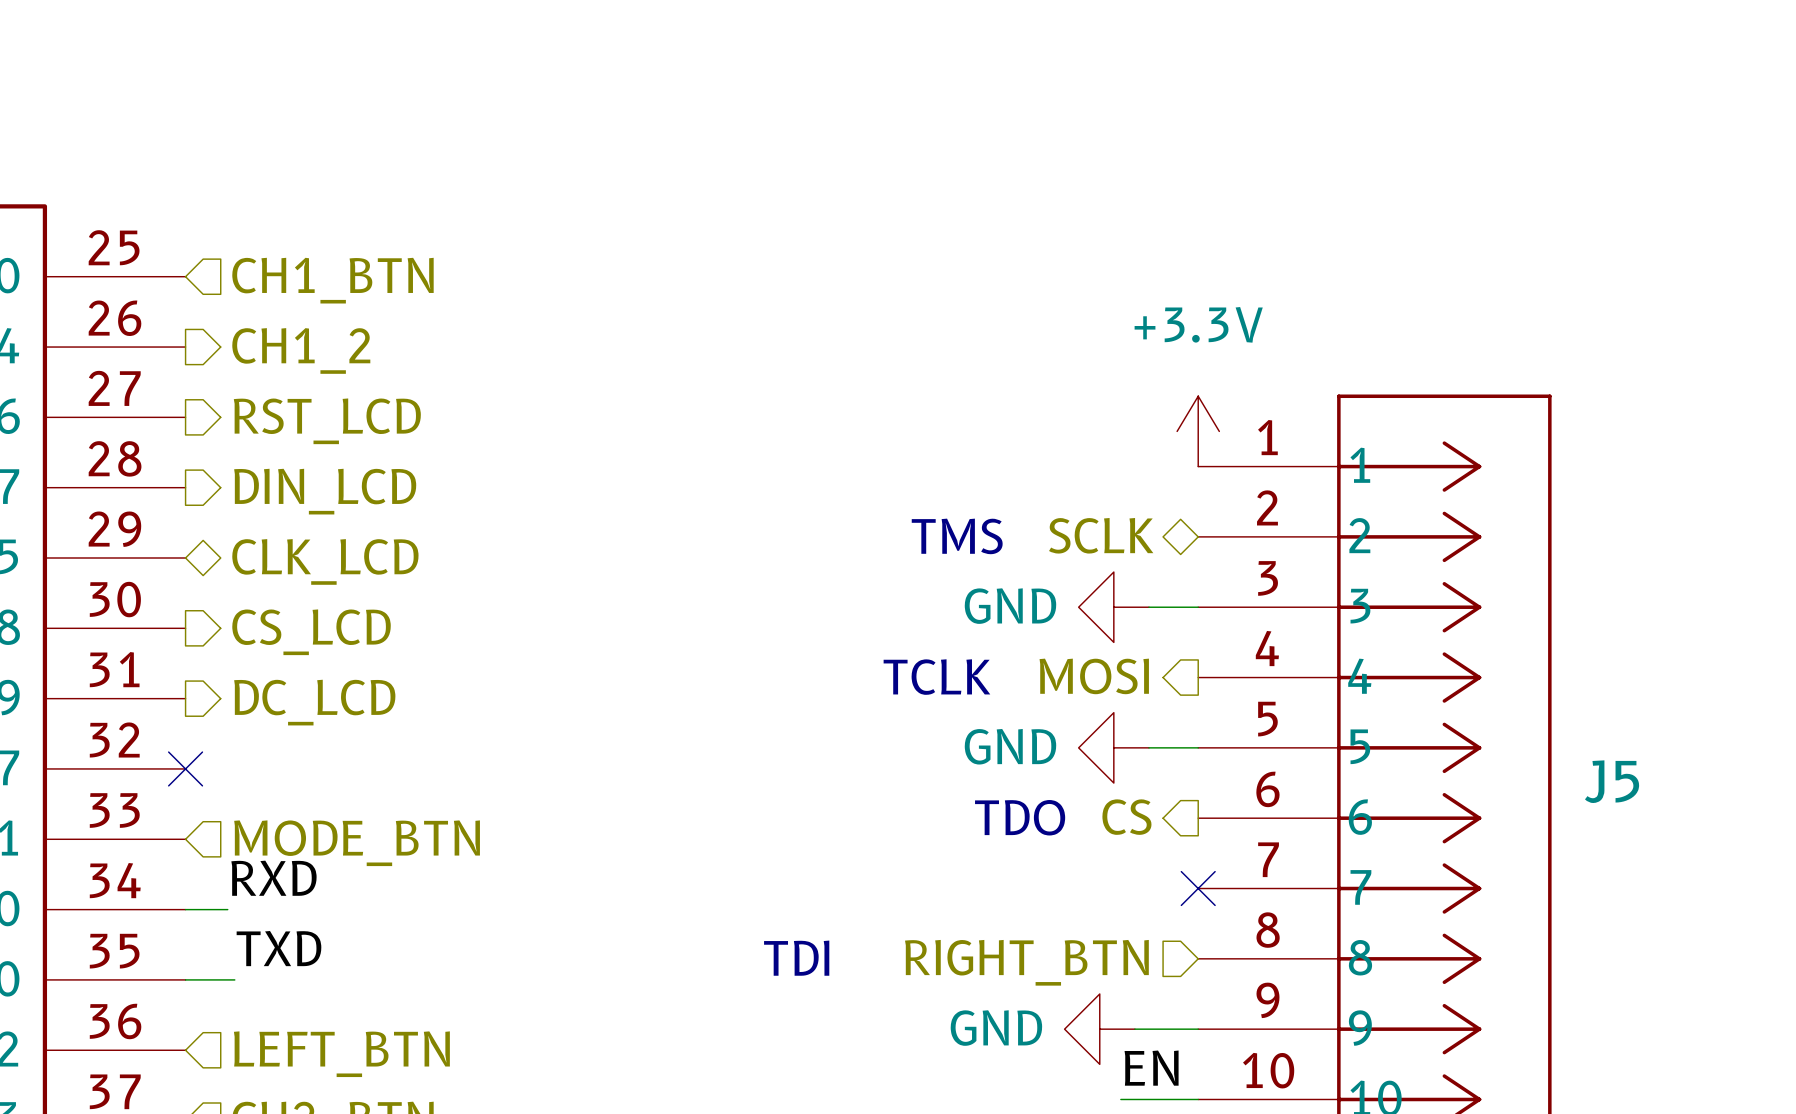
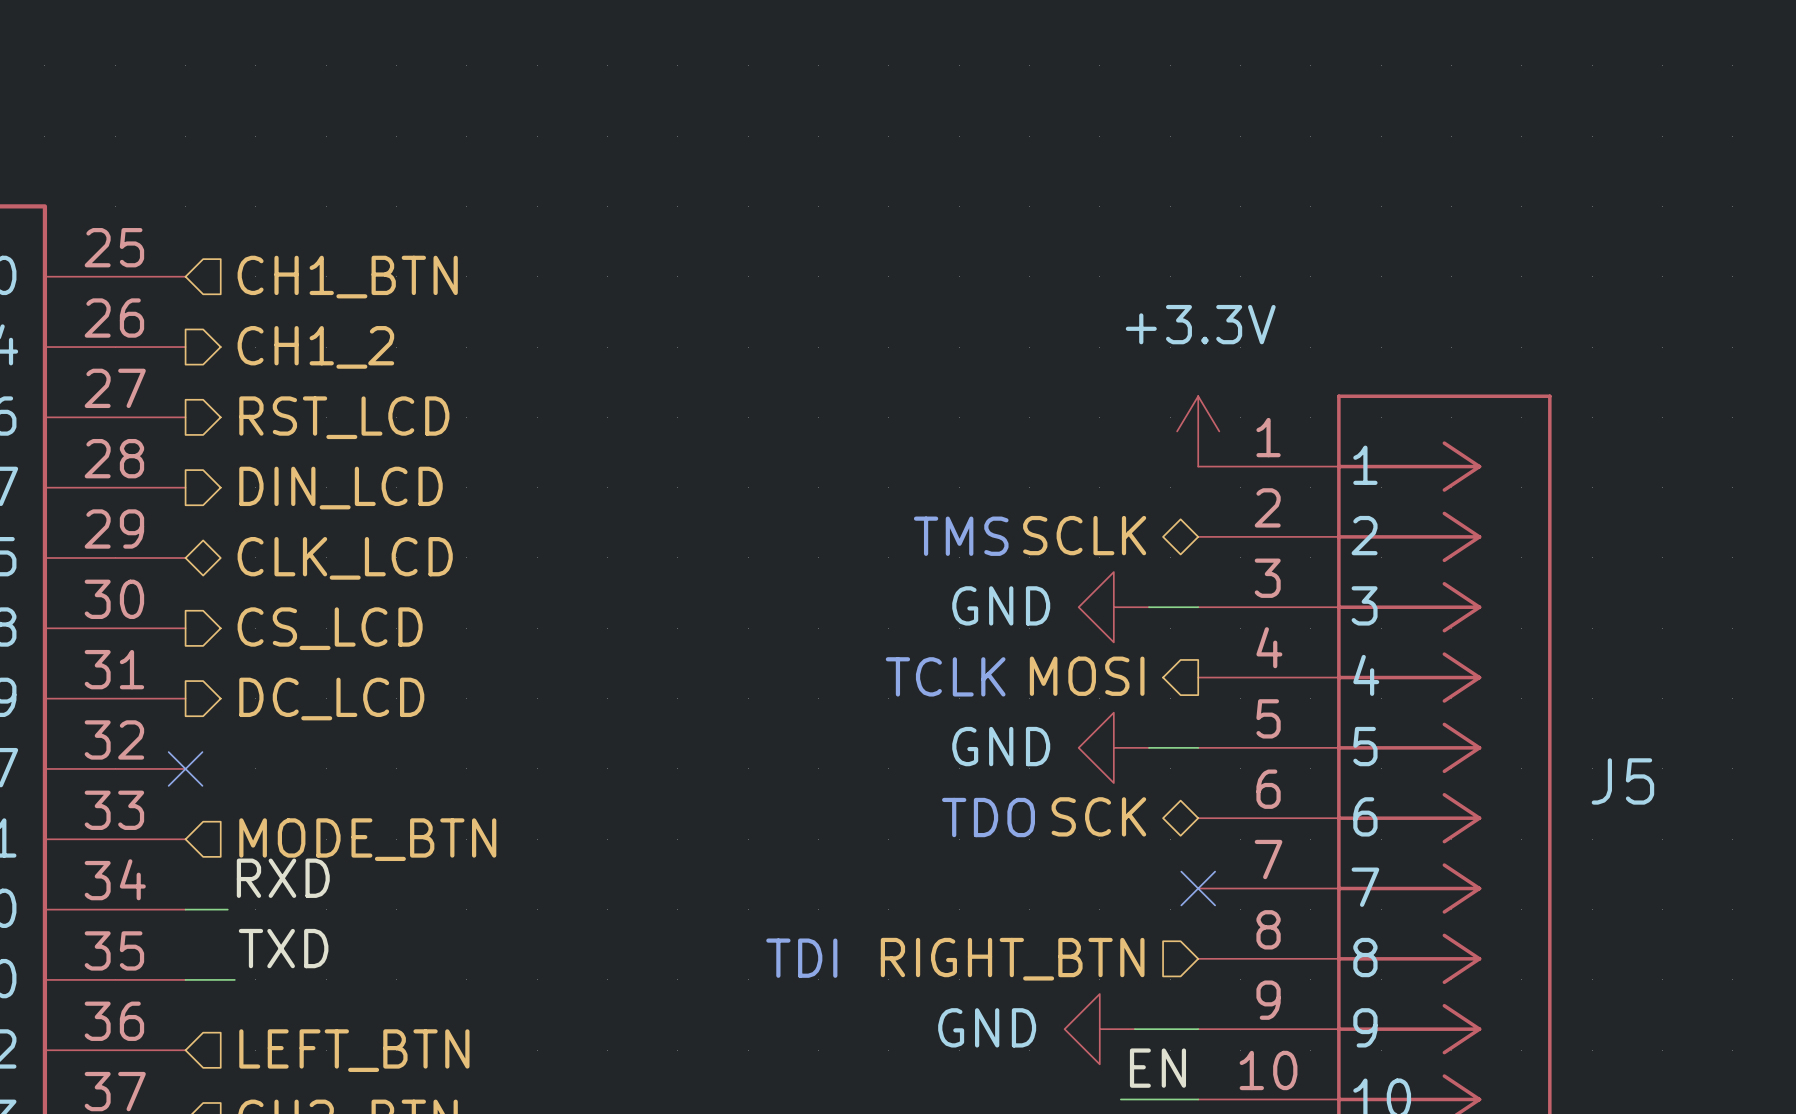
text position: TDO (1020, 817) -> TDO (988, 817)
hierarchical label shape: output (1126, 817) -> bidirectional (1098, 816)
hierarchical label: CS (1126, 817) -> SCK (1098, 816)

